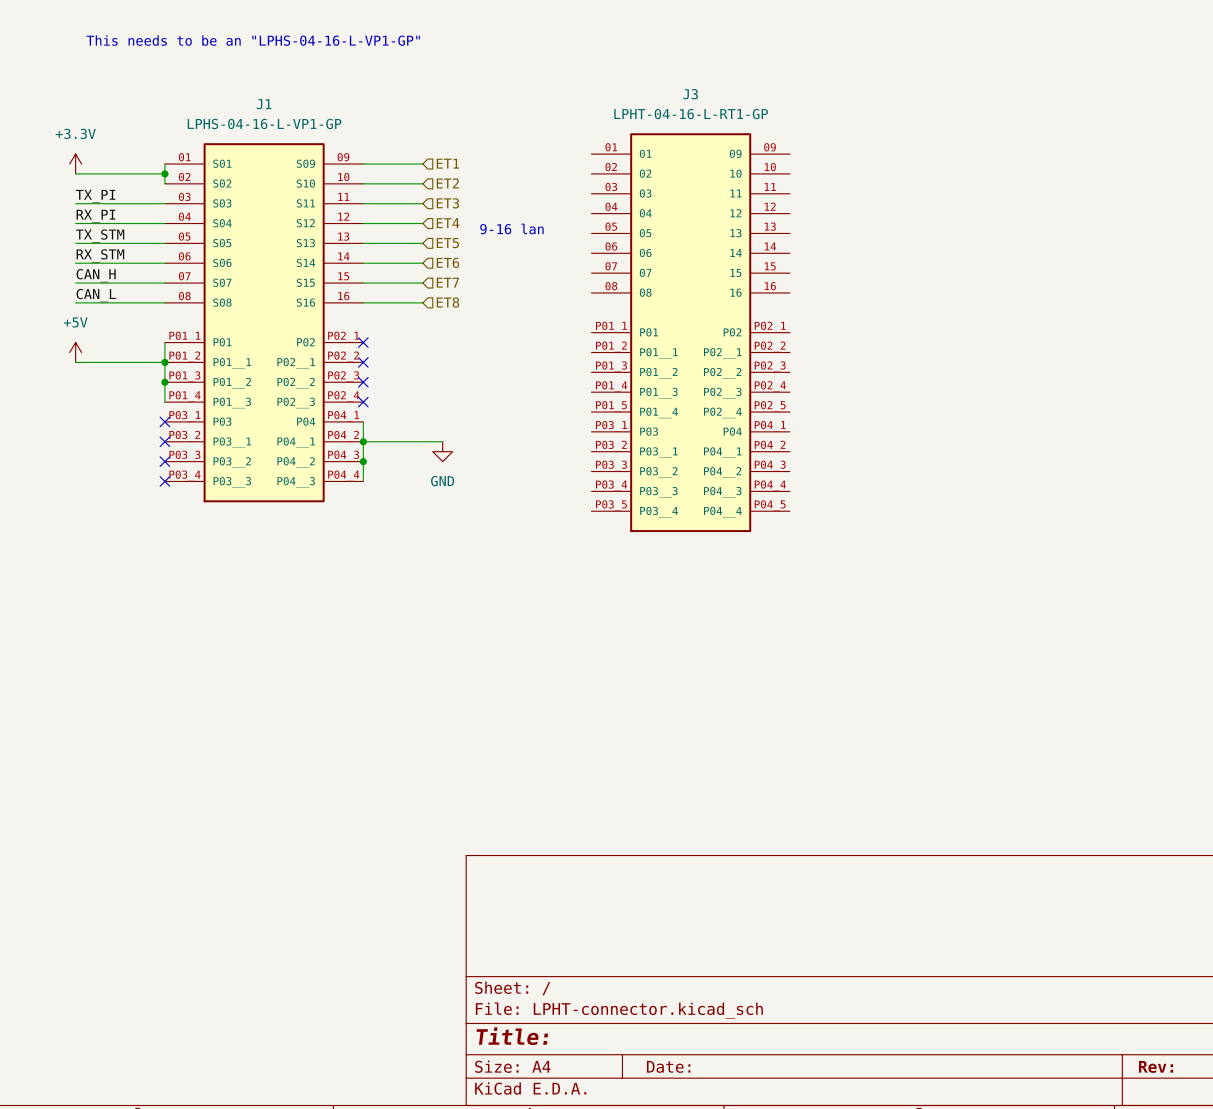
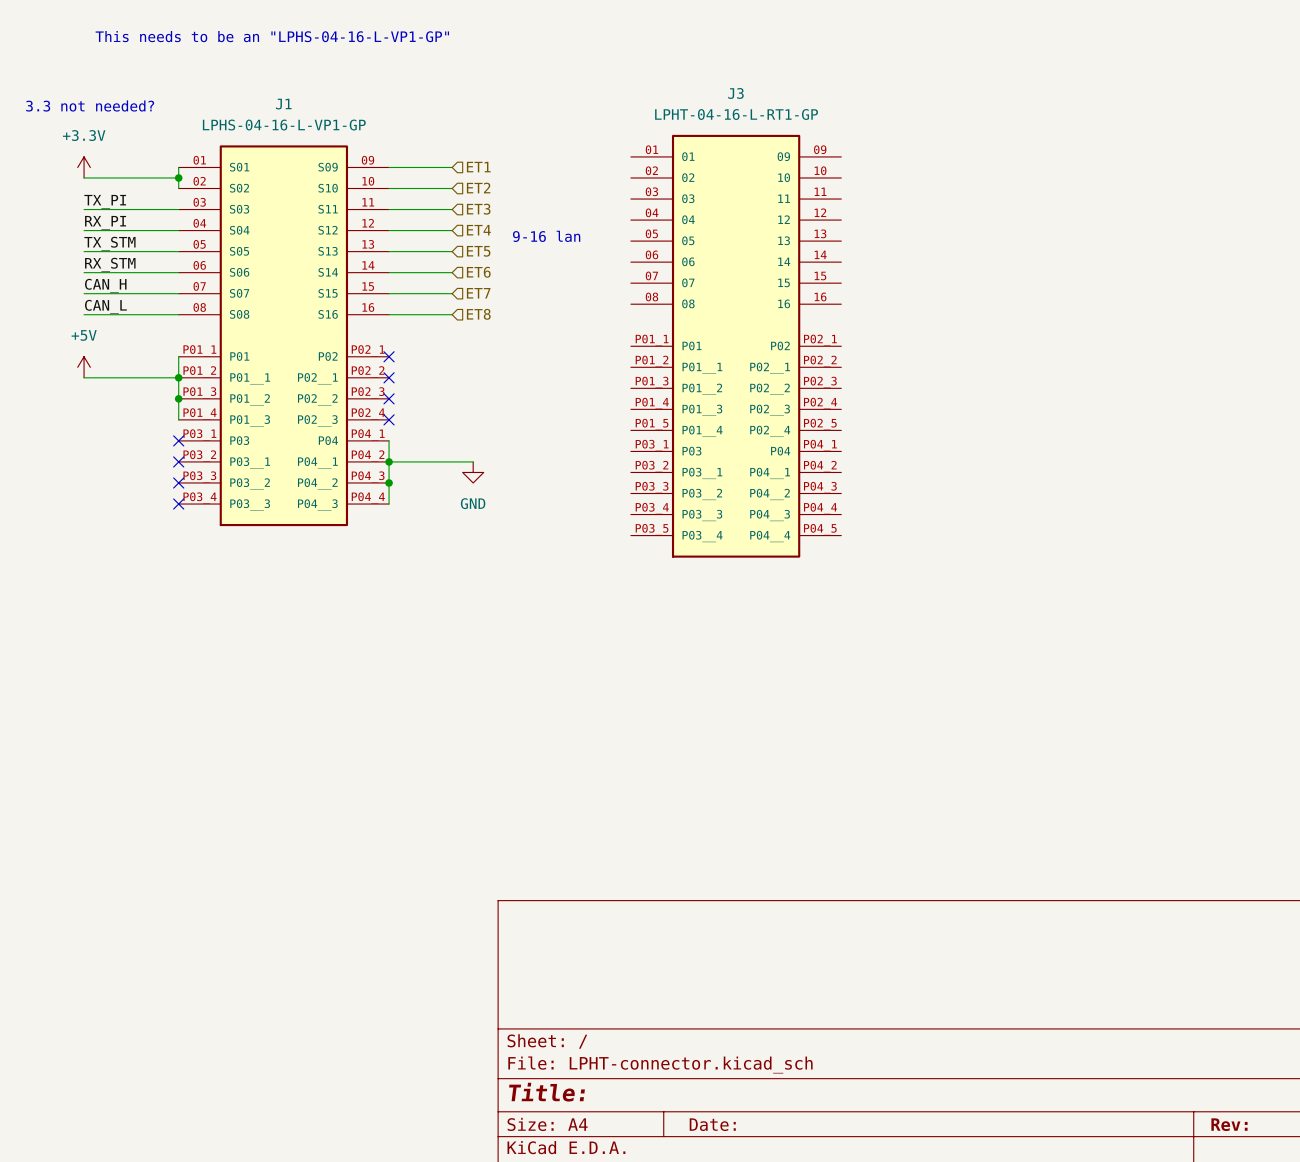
text: none -> 3.3 not needed? (90, 105)

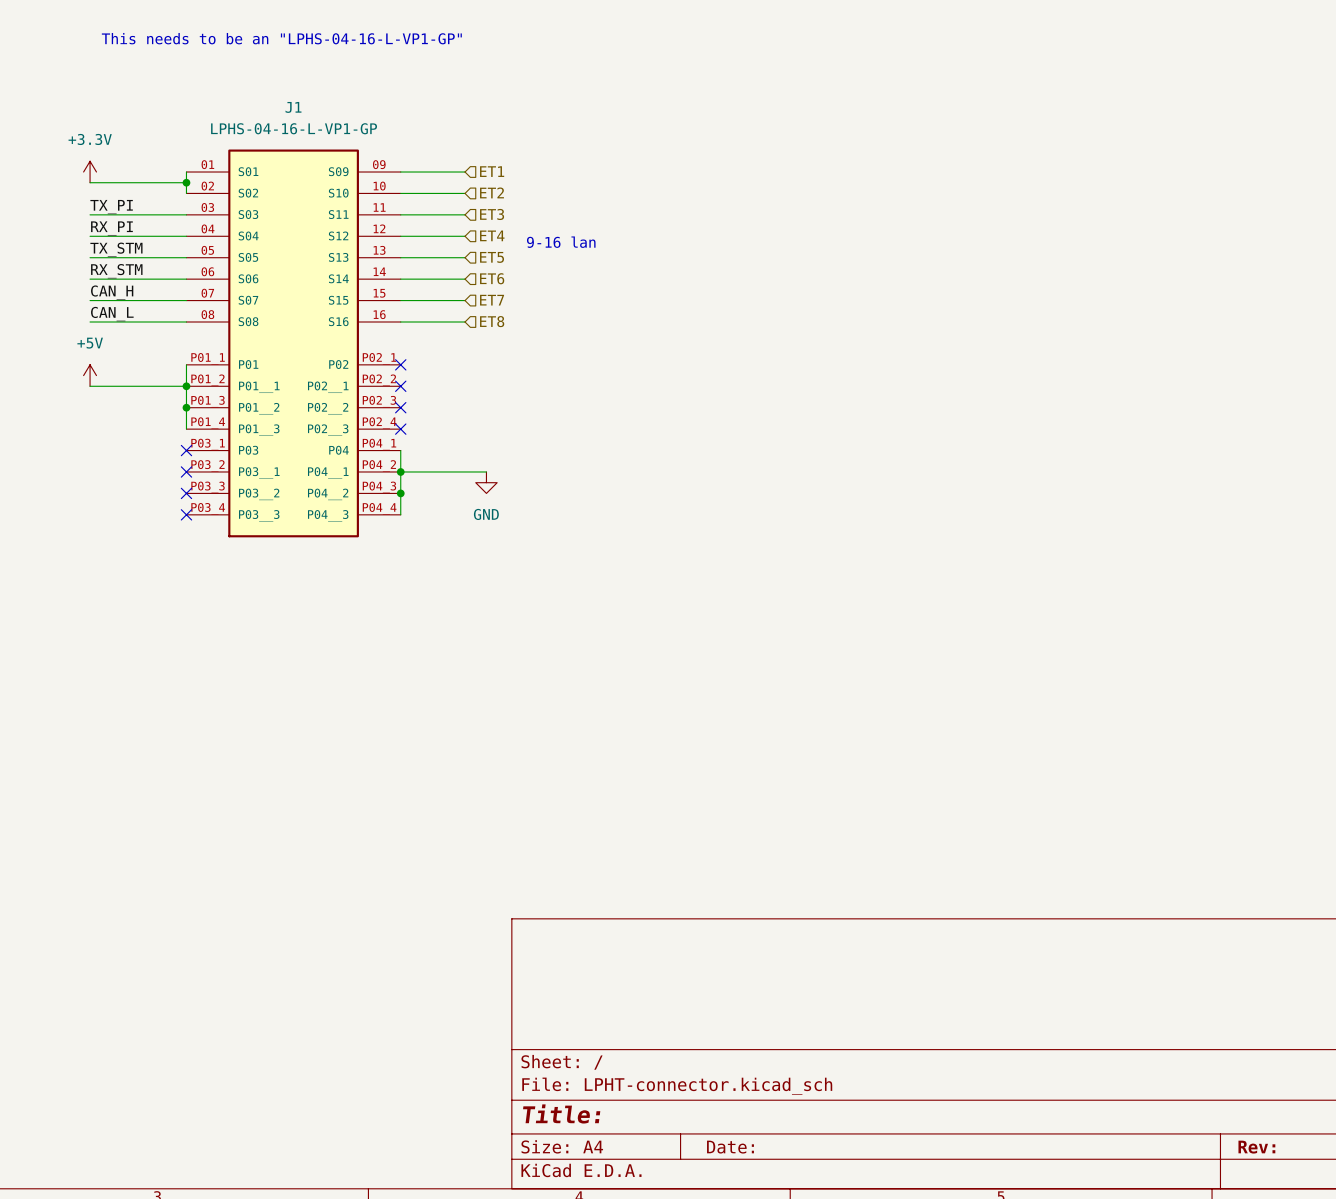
text: 3.3 not needed? (90, 105) -> none
J3: LPHT-04-16-L-RT1-GP (736, 346) -> none

